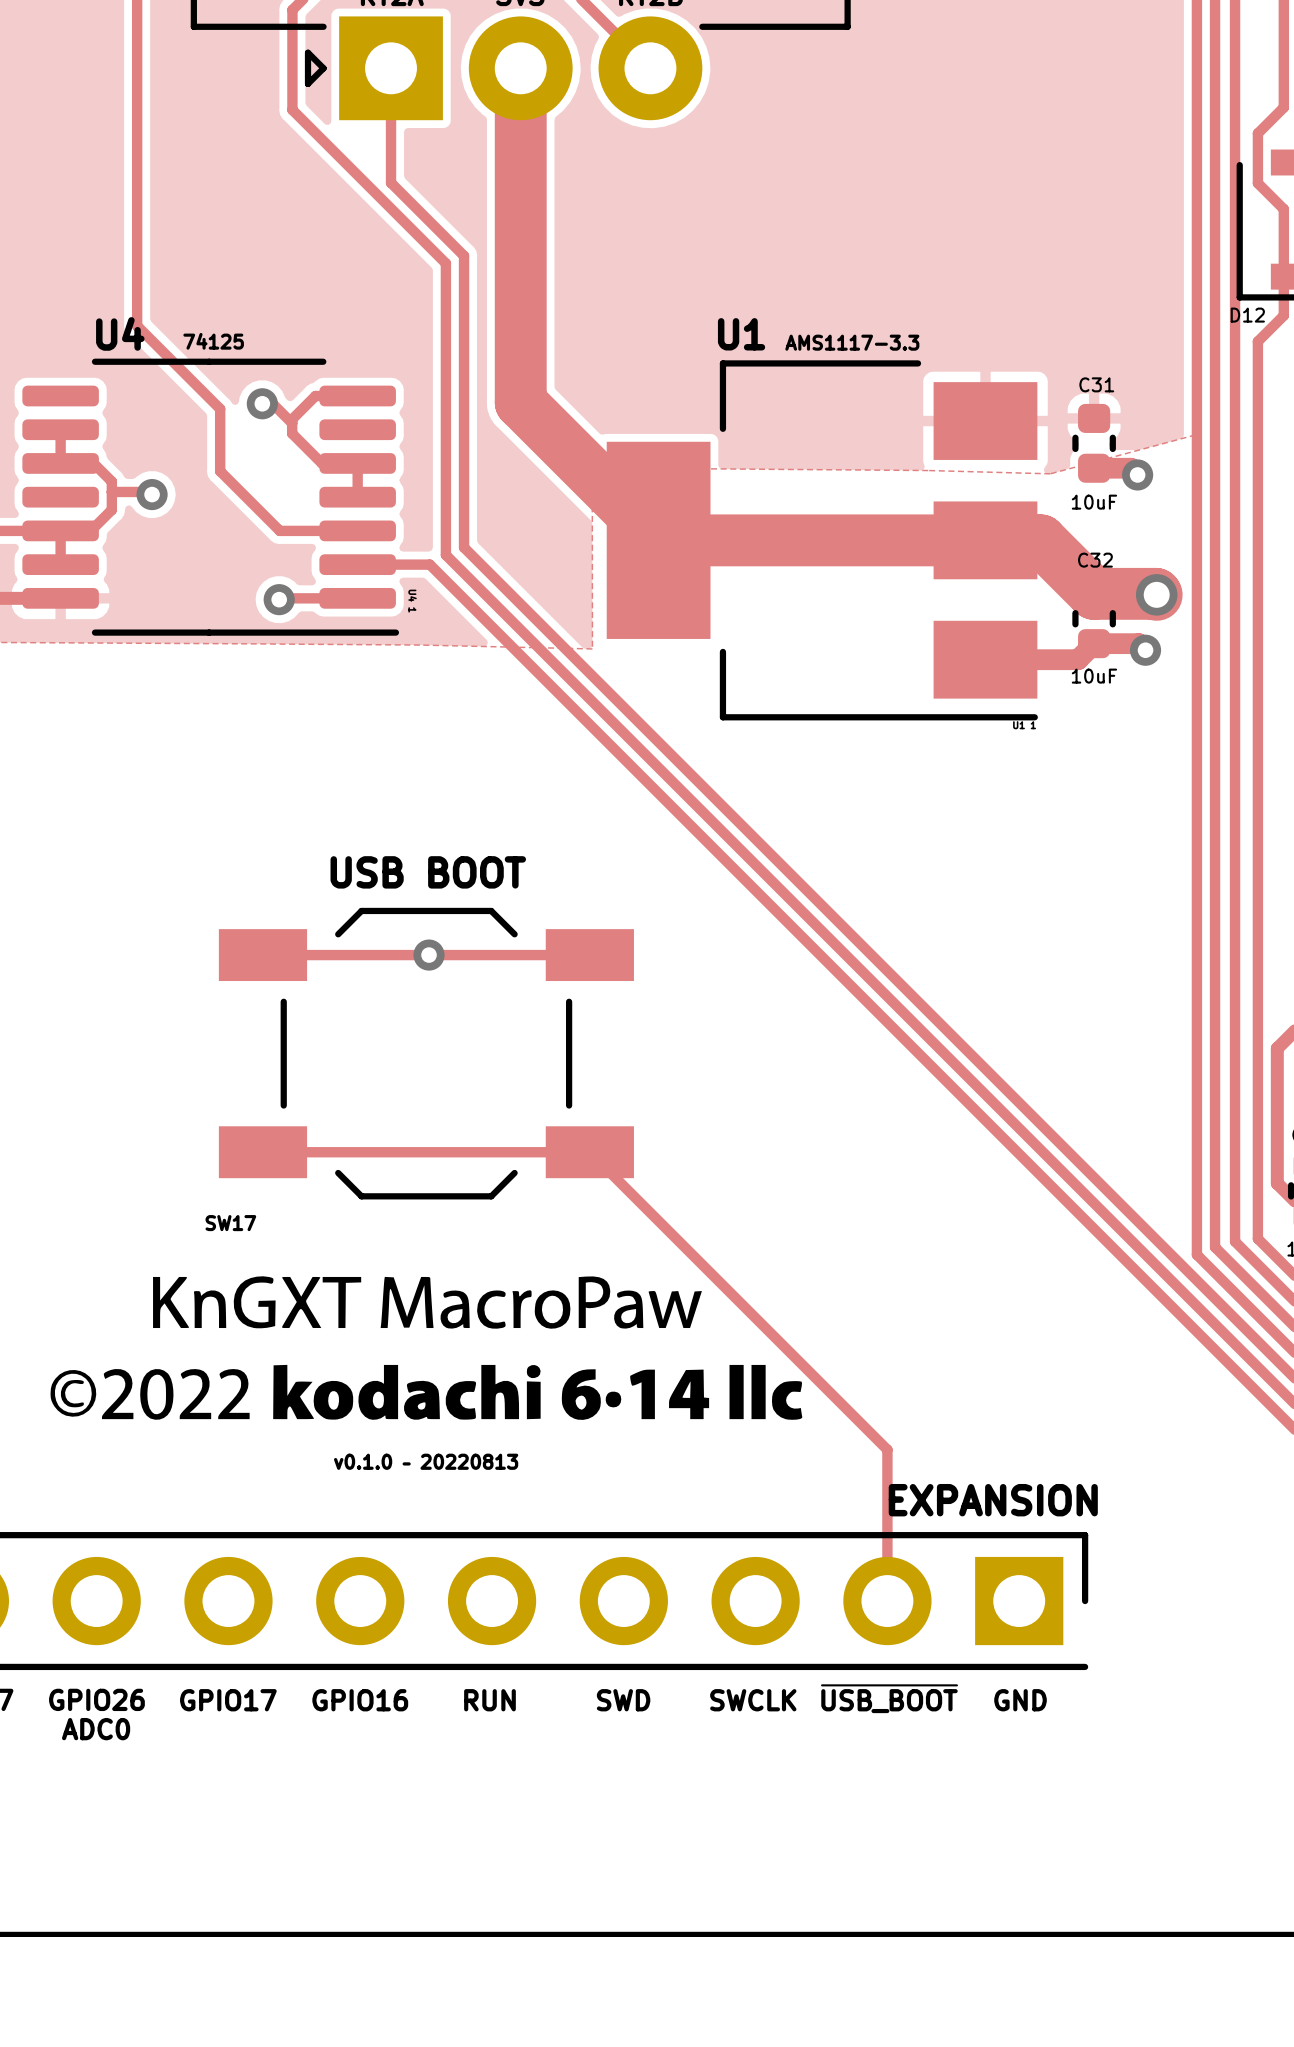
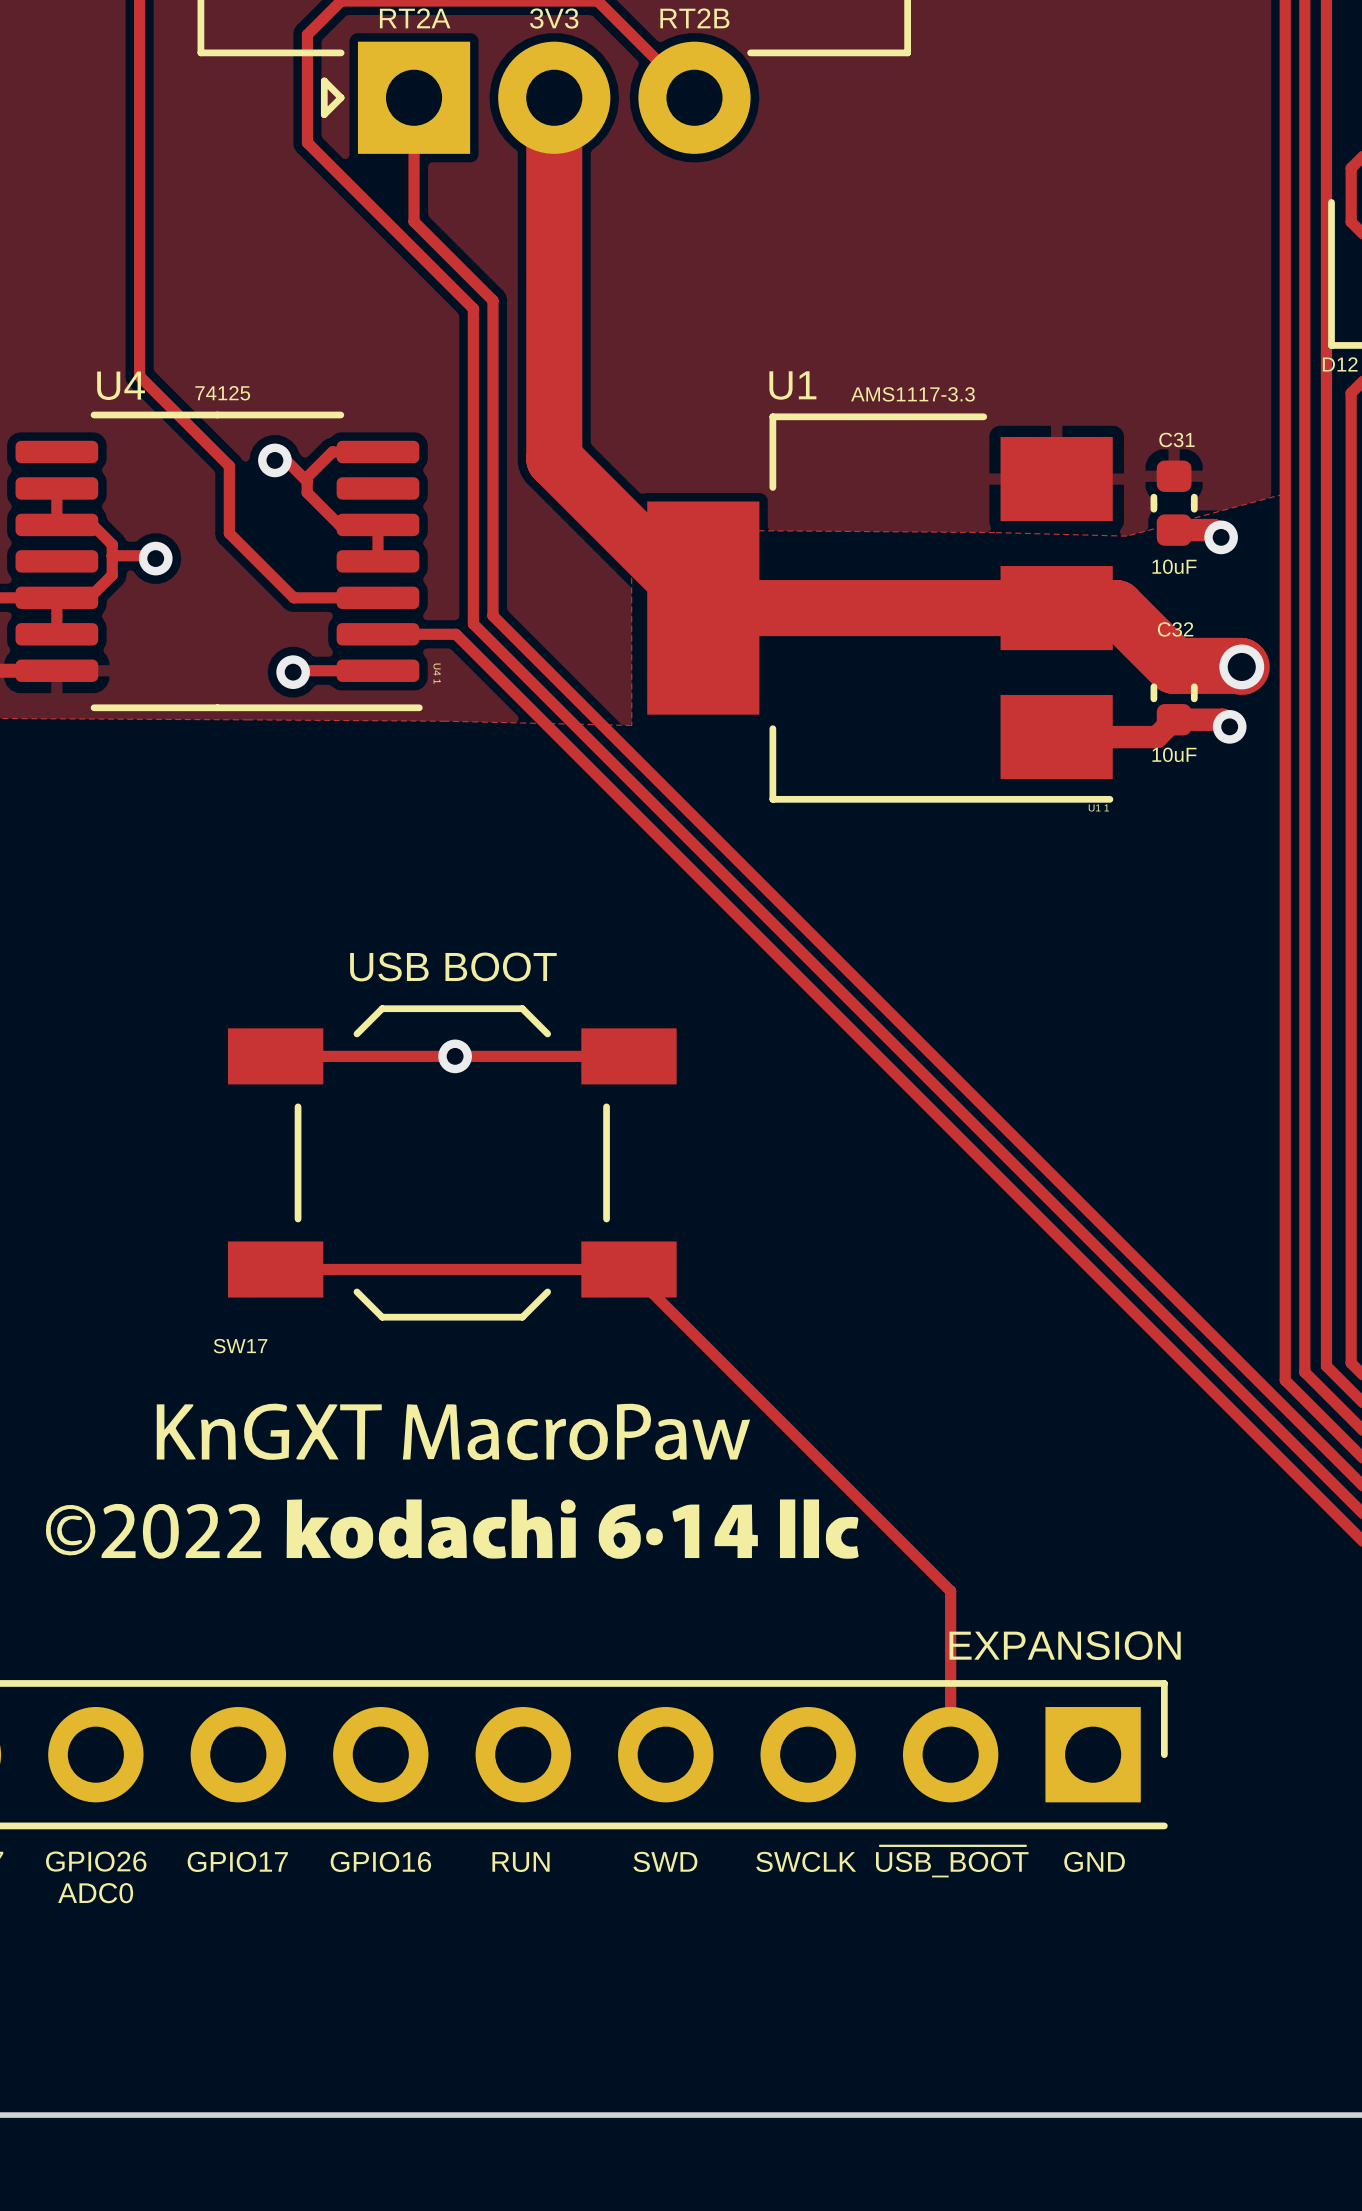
text: v0.1.0 – 20220813 (426, 1461) -> none

